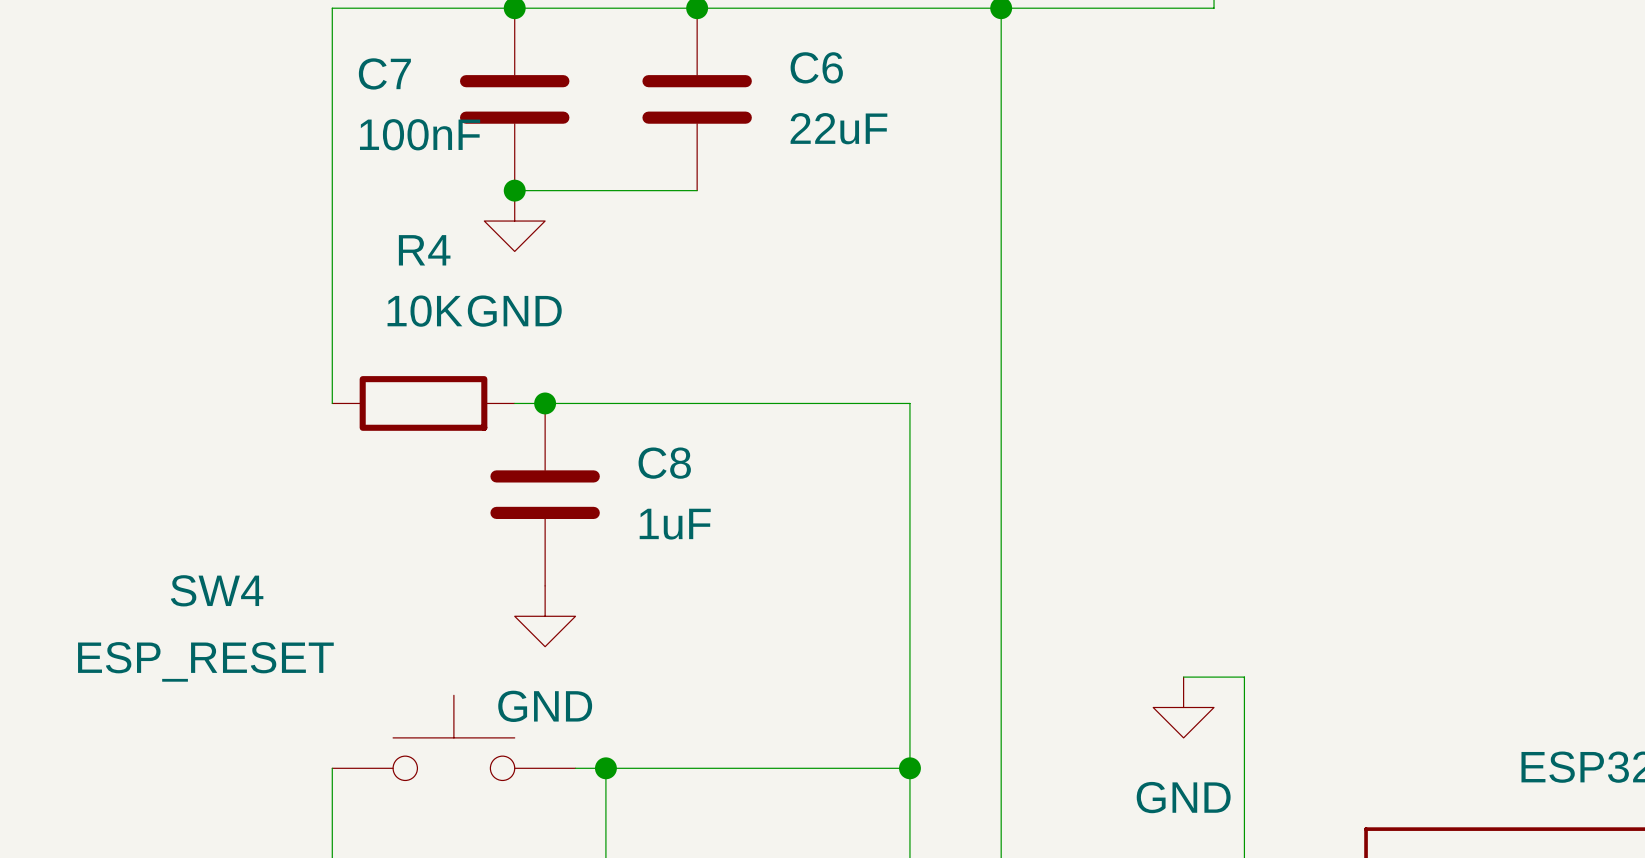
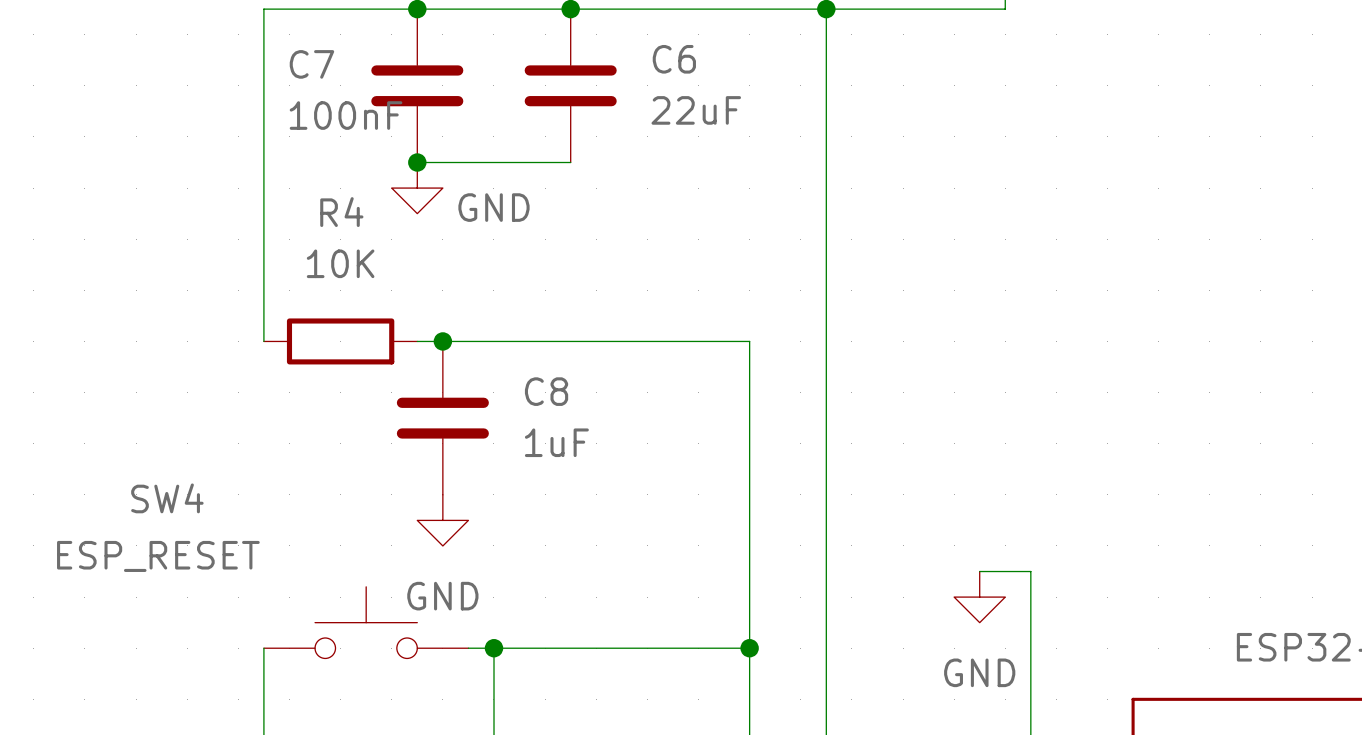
power symbol text position: GND (514, 311) -> GND (493, 207)

